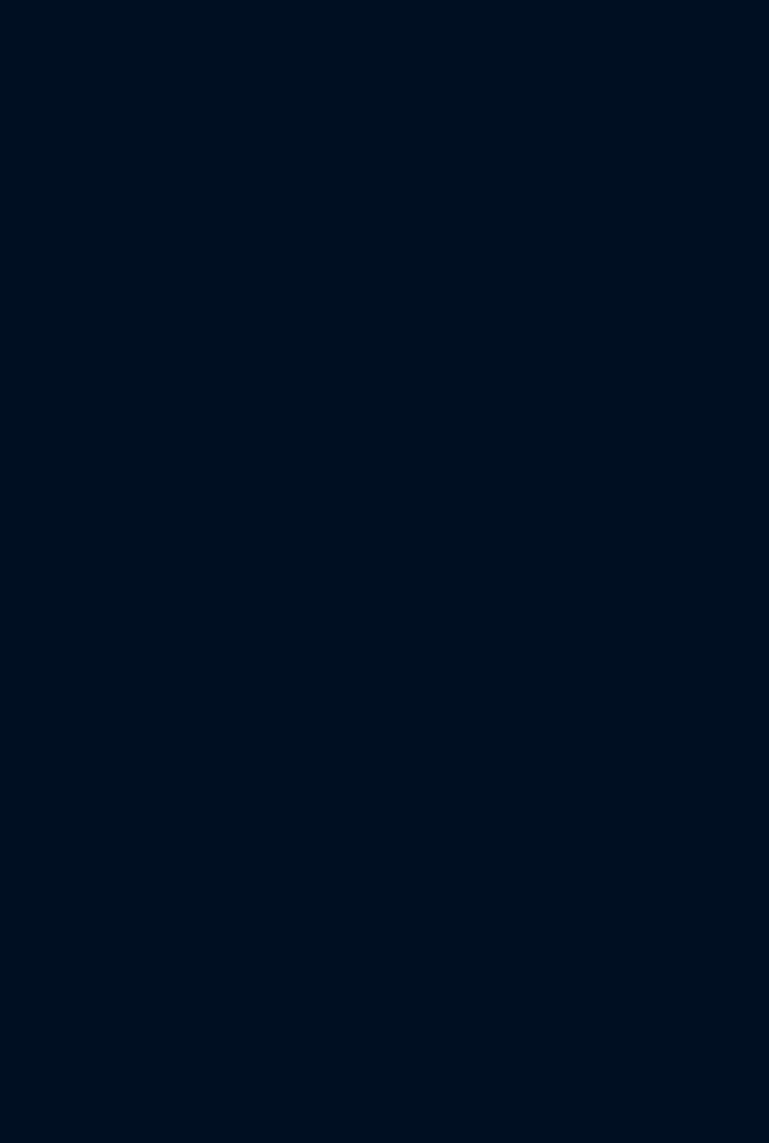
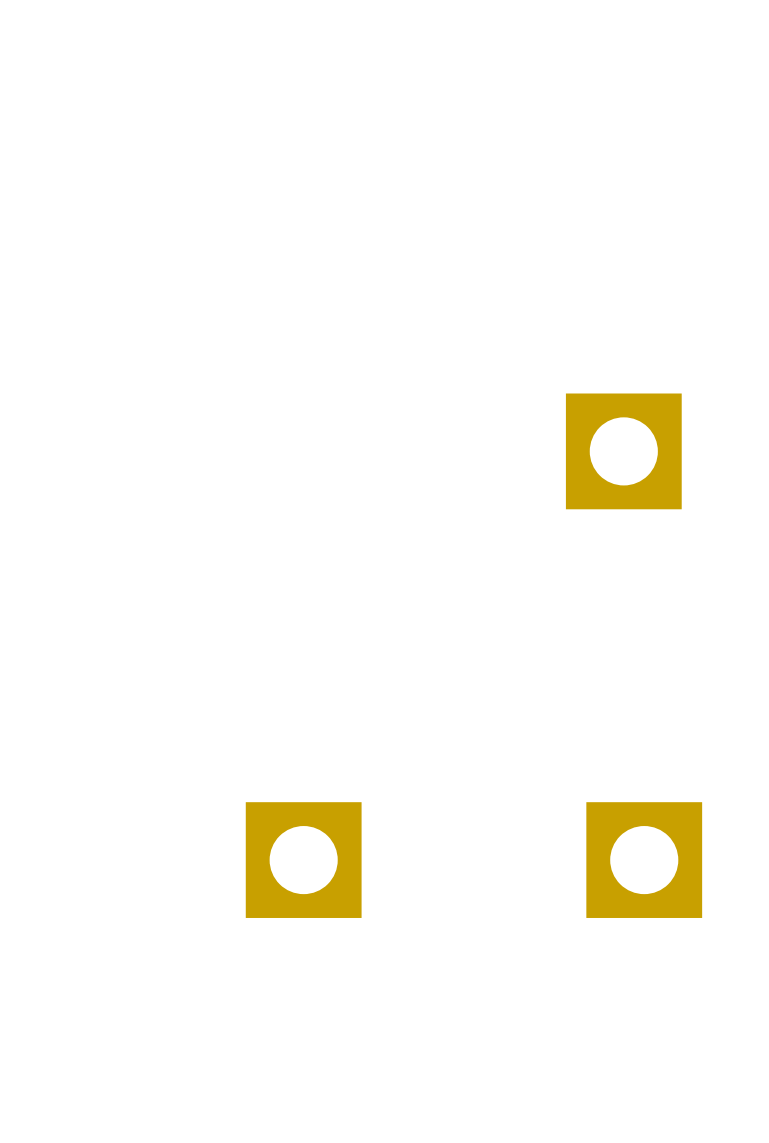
part: none -> (623, 451)
part: none -> (303, 860)
part: none -> (644, 860)

